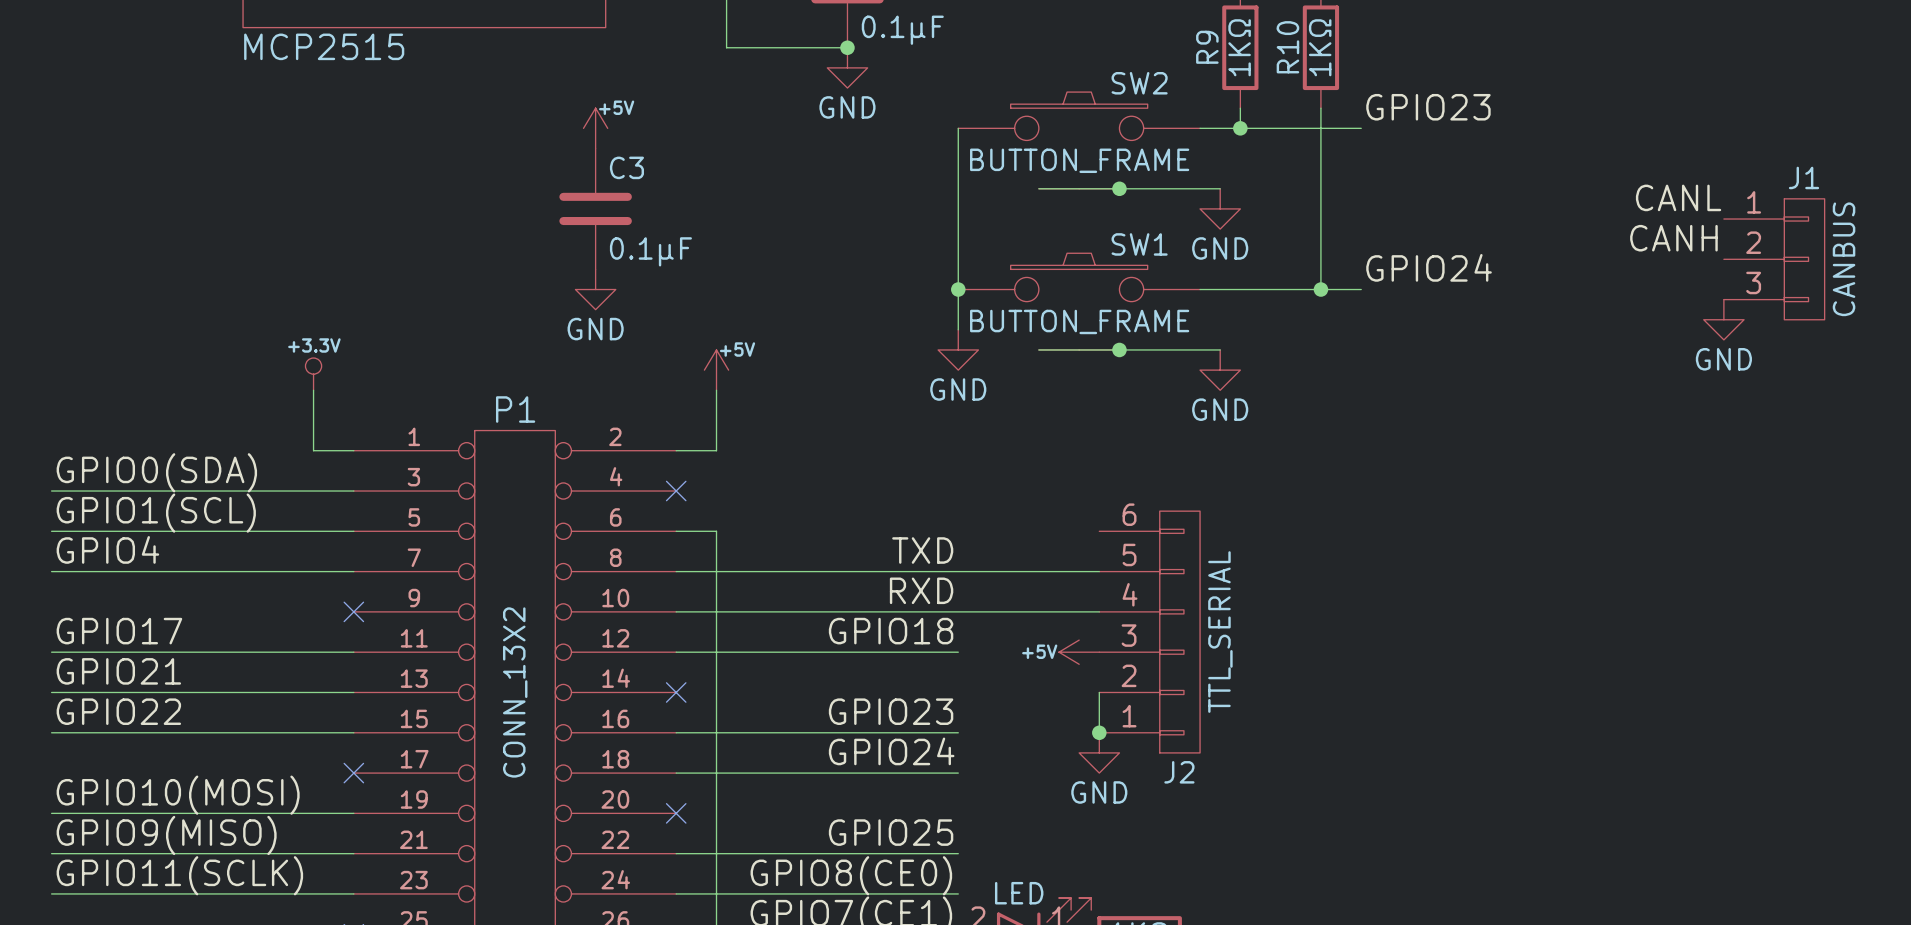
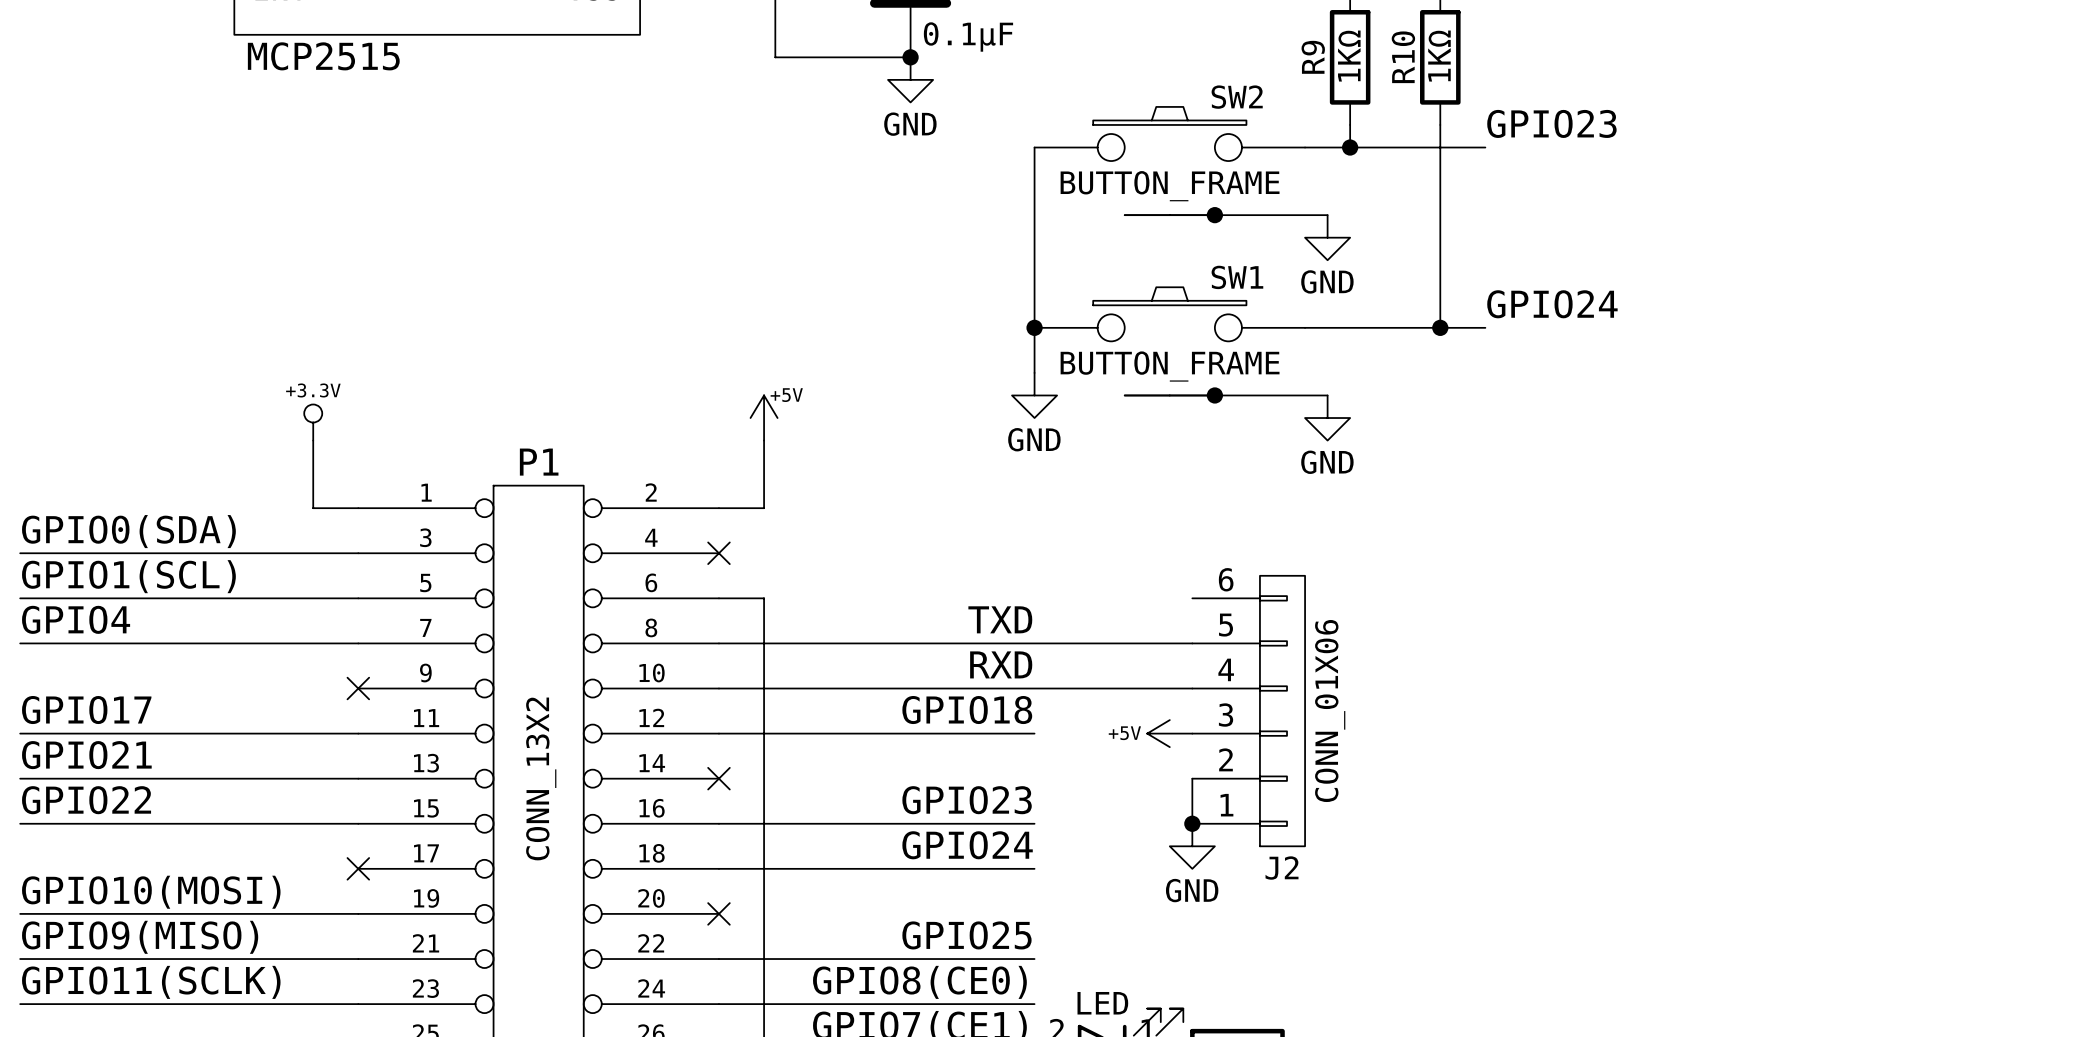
power symbol: +5V (595, 128) -> none
label: CANL (1678, 197) -> none
C3: 0.1μF (595, 208) -> none
label: CANH (1673, 238) -> none
J1: CANBUS (1774, 259) -> none
power symbol: GND (595, 289) -> none
power symbol: GND (1723, 319) -> none
J2 value: TTL_SERIAL (1220, 632) -> CONN_01X06 (1330, 711)

